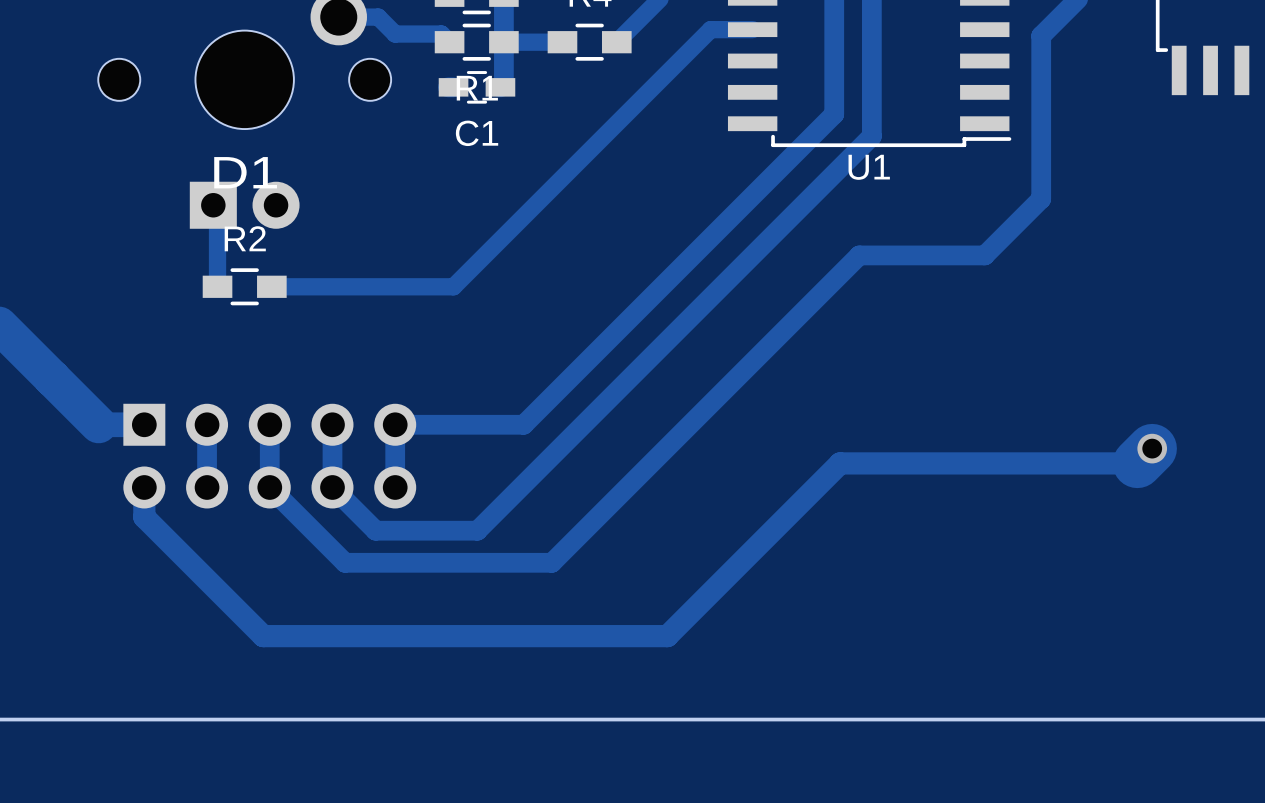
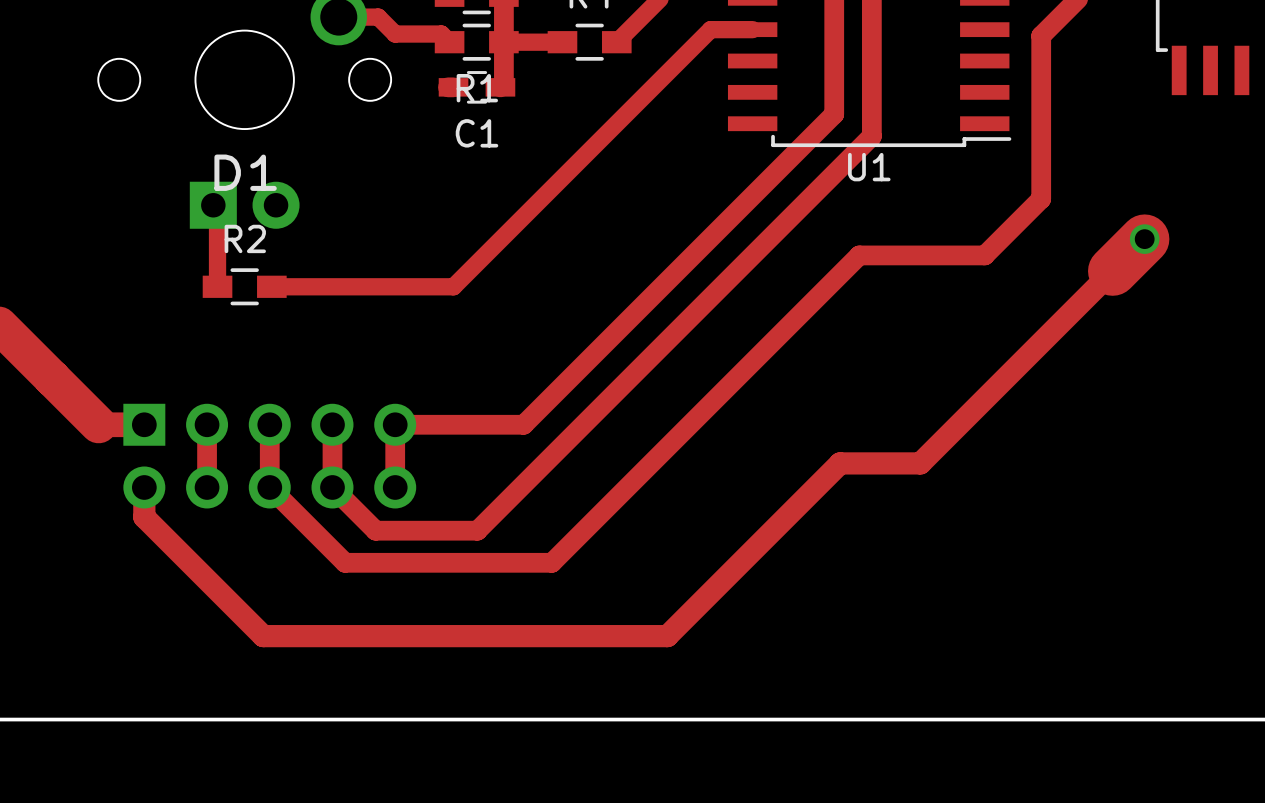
via: none -> (1144, 239)
track: (1152, 448) (1137, 463) (920, 463) -> (1144, 239) (920, 463)
via: (1152, 448) -> none

